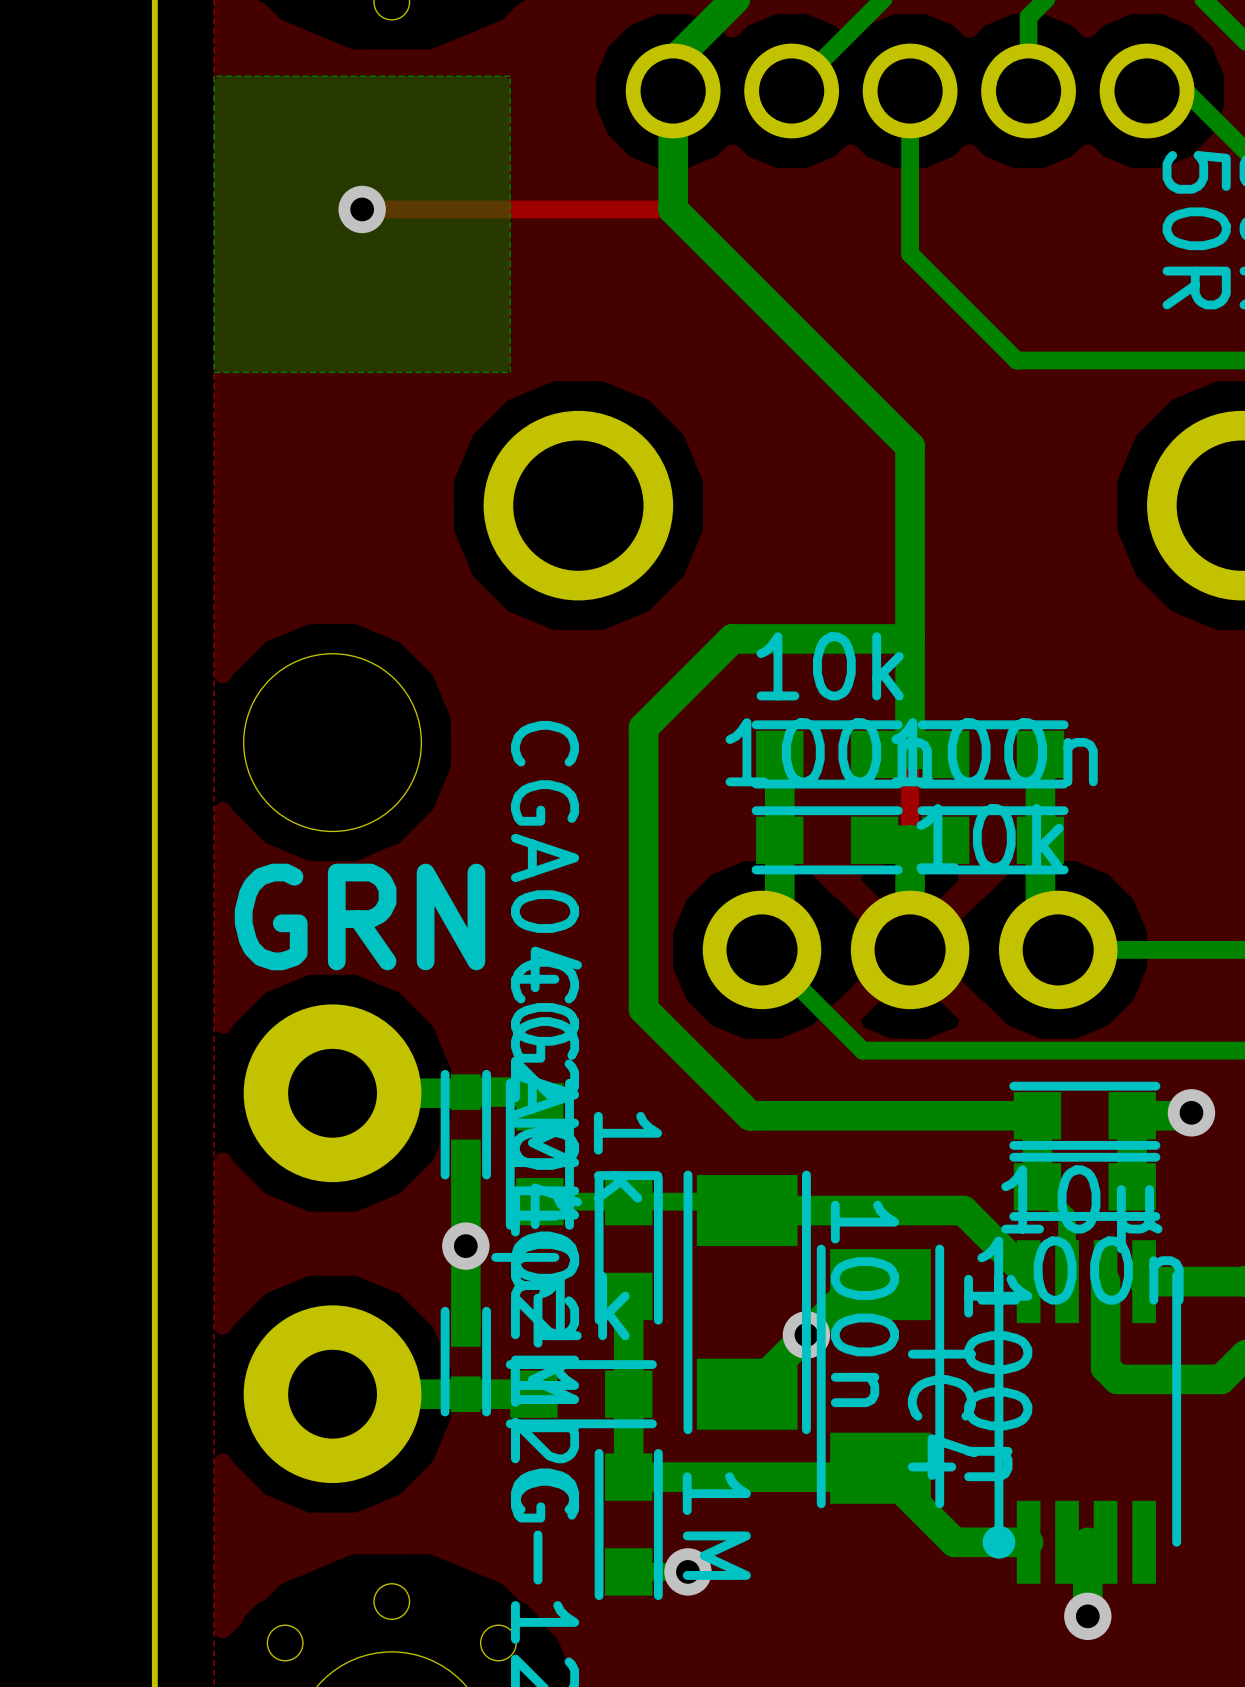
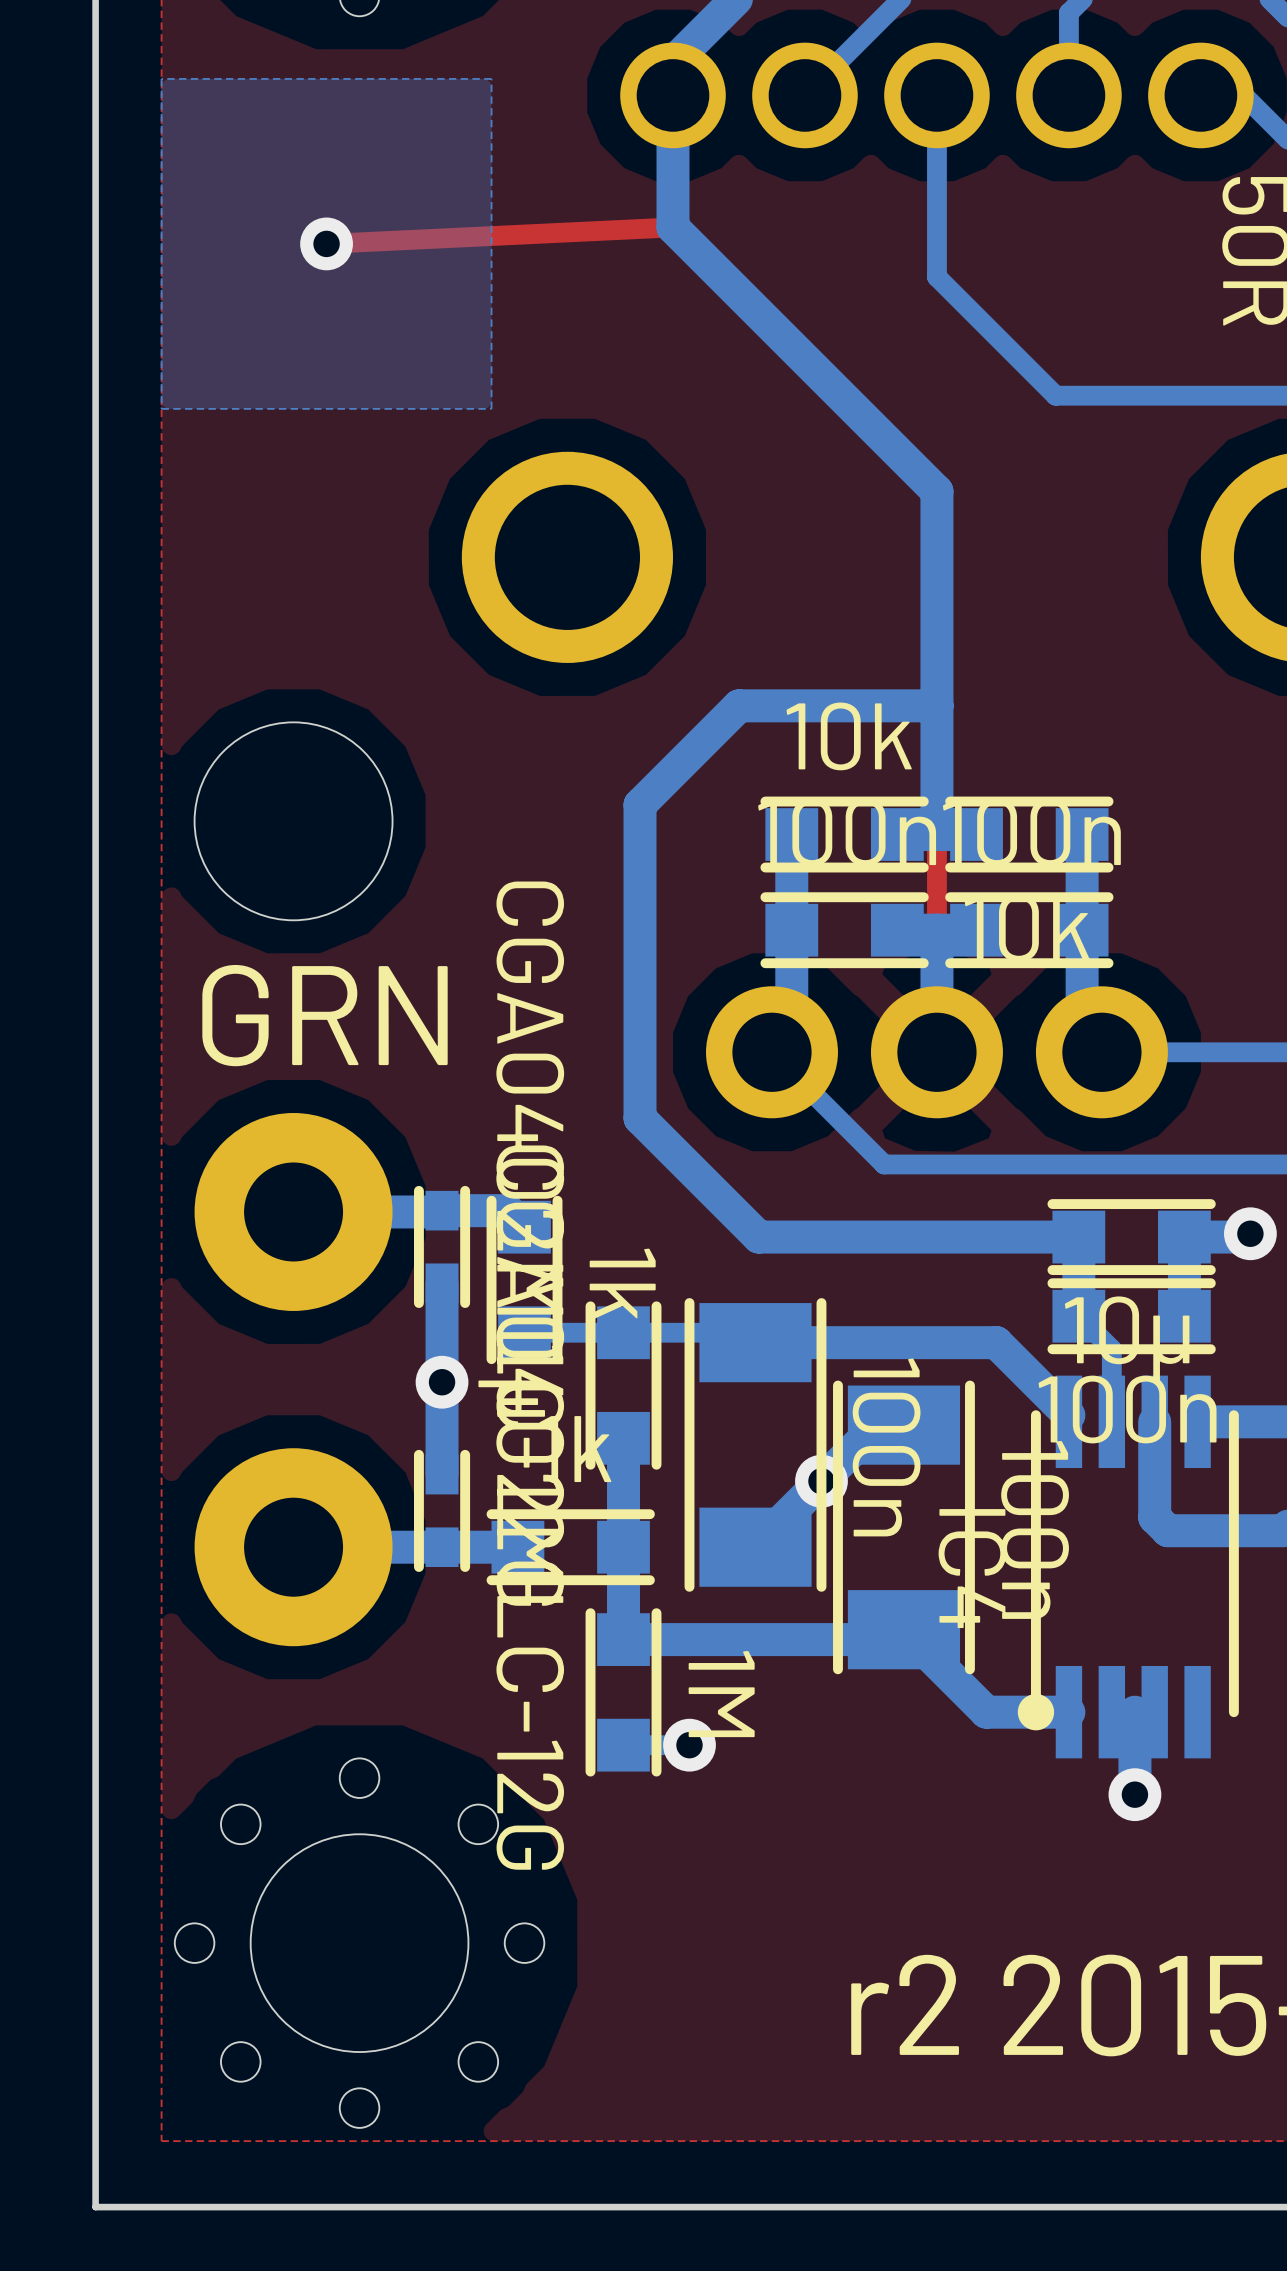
via position: (362, 209) -> (326, 243)
top track: (673, 209) (362, 209) -> (673, 227) (326, 243)

